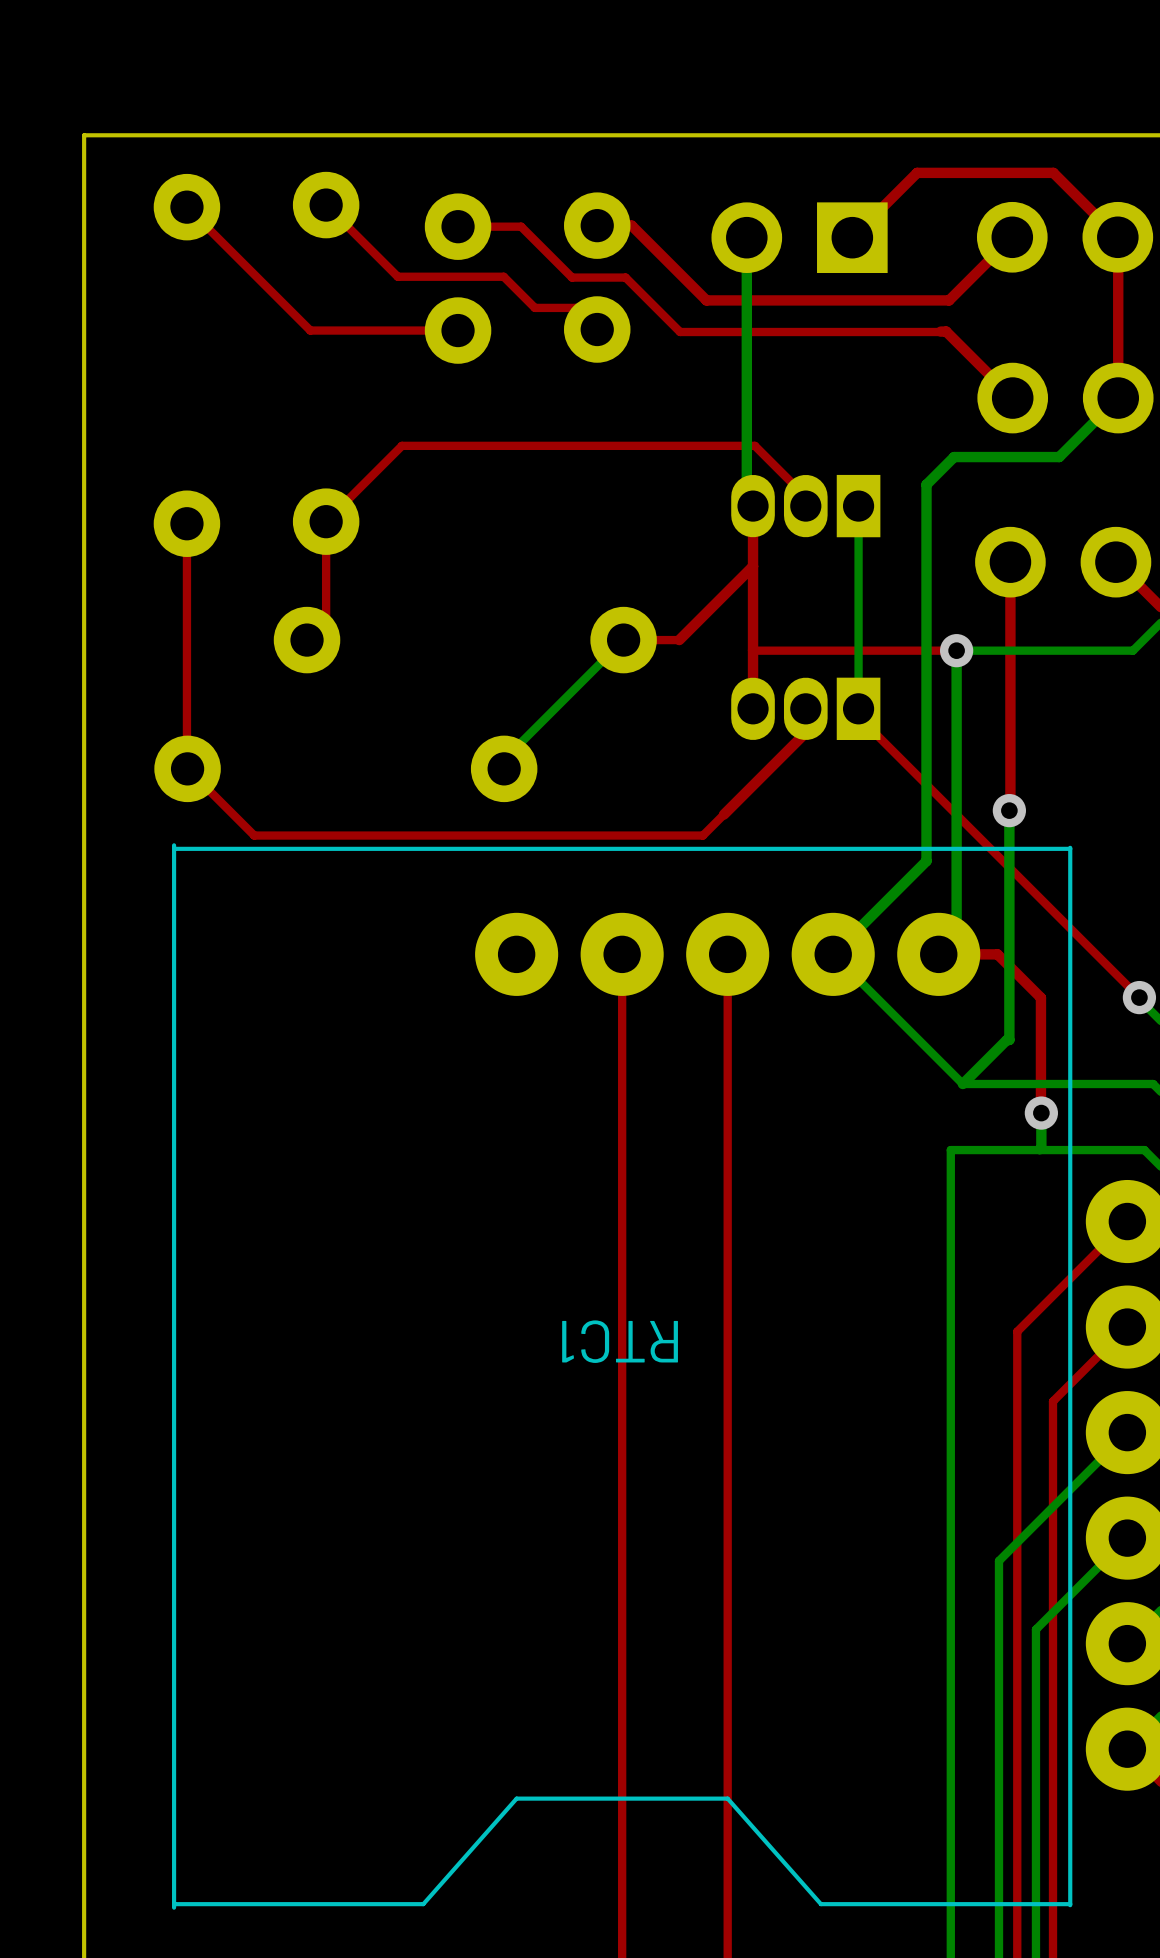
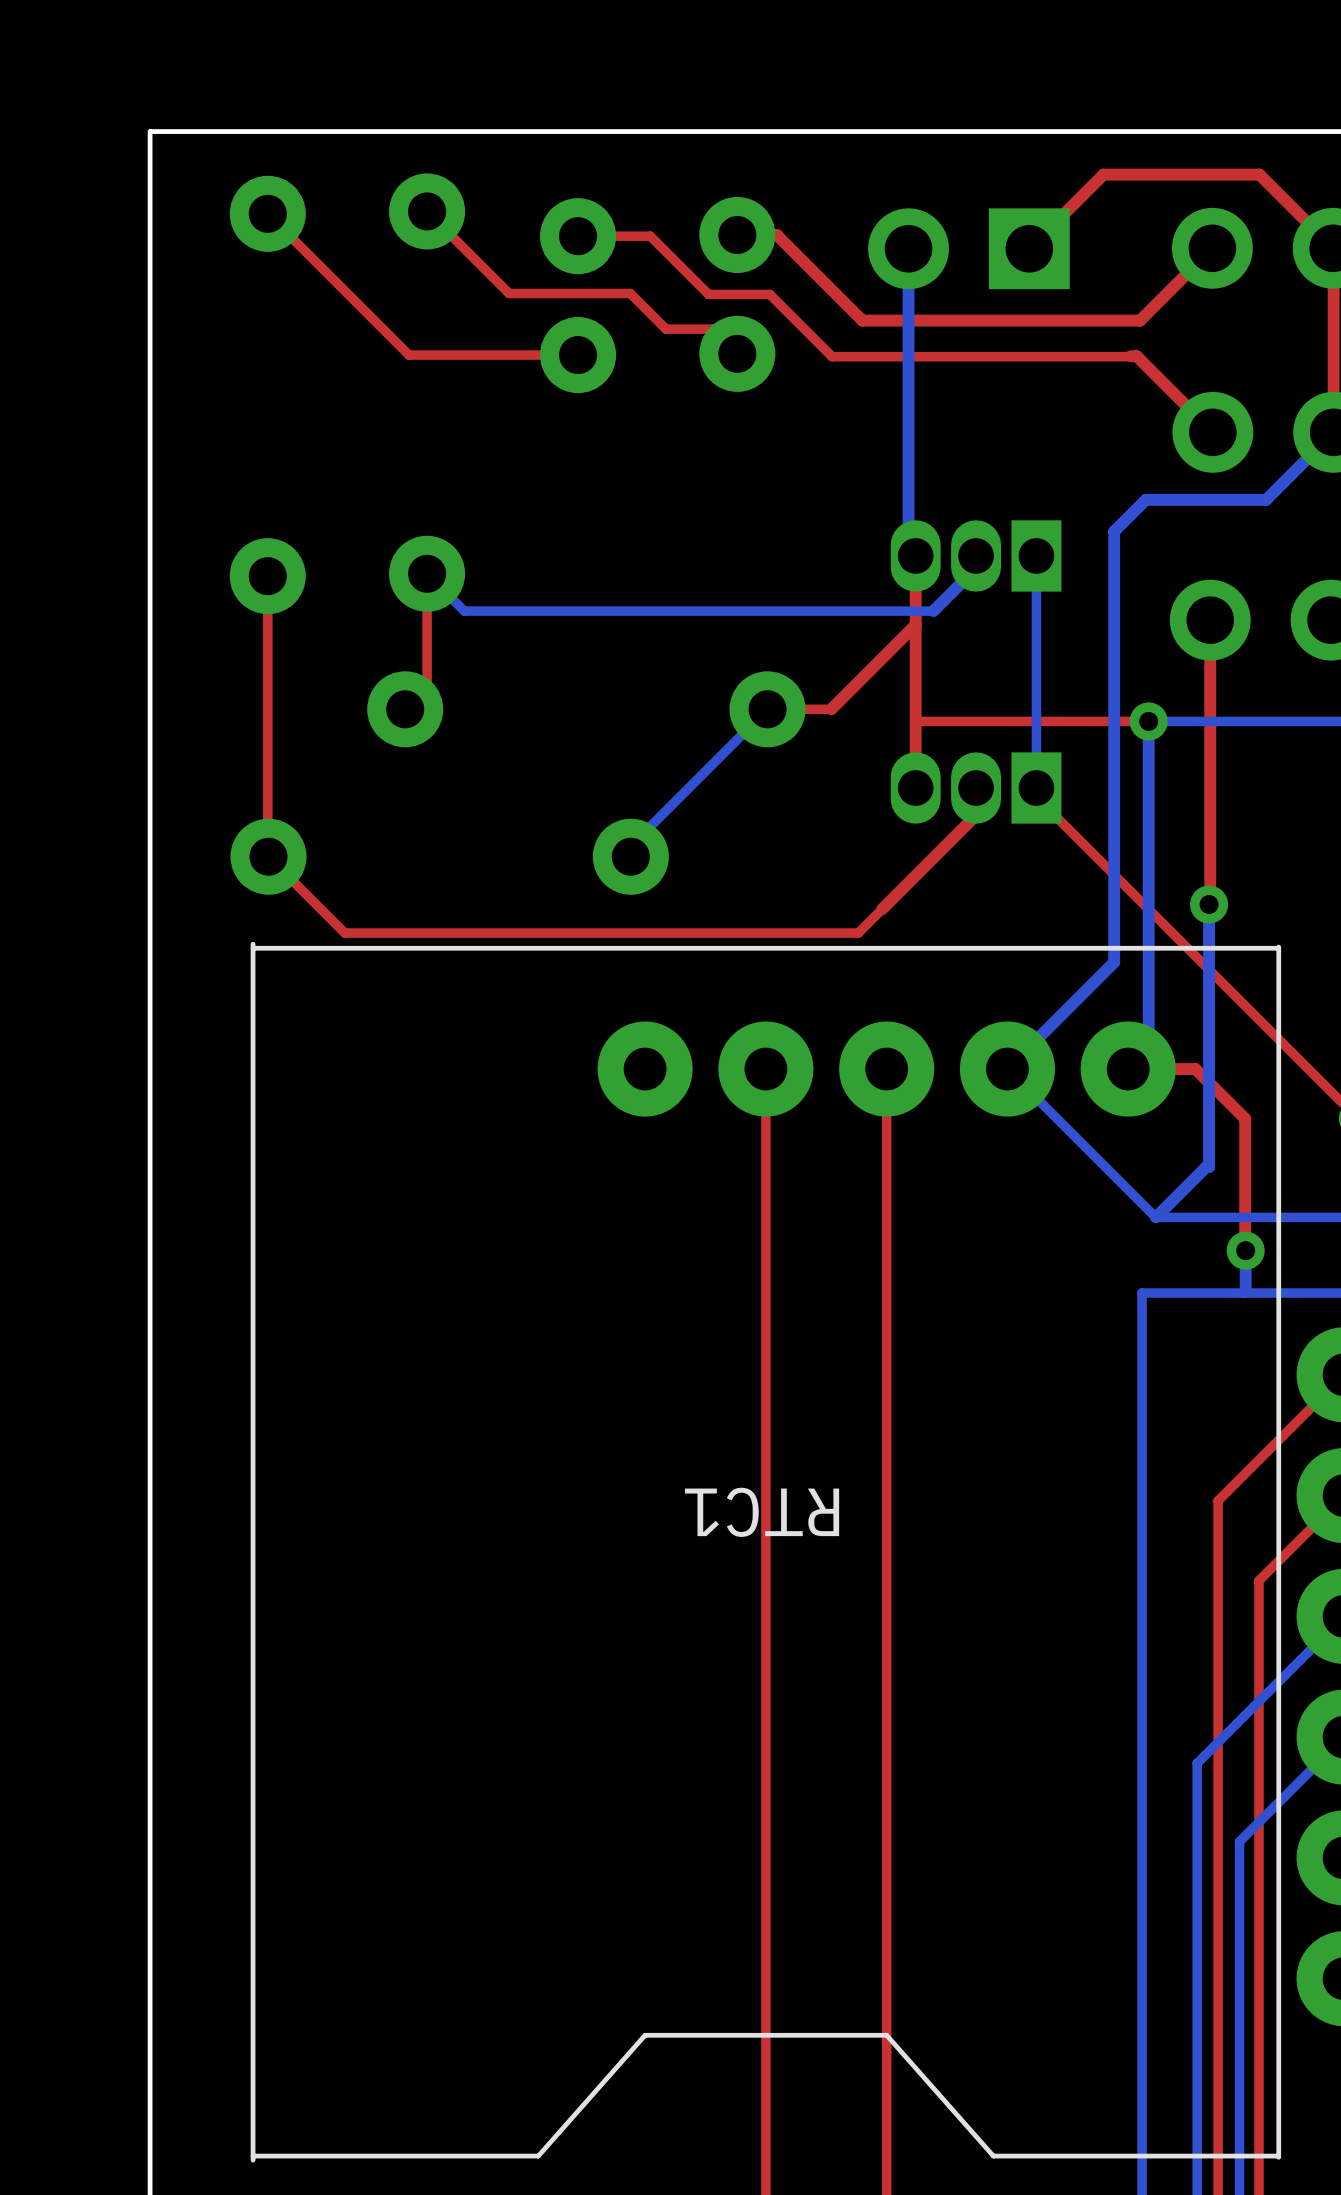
top track: (805, 506) (805, 496) (754, 445) (401, 445) (326, 521) -> none
bottom track: none -> (976, 568) (933, 611) (464, 611) (427, 573)

